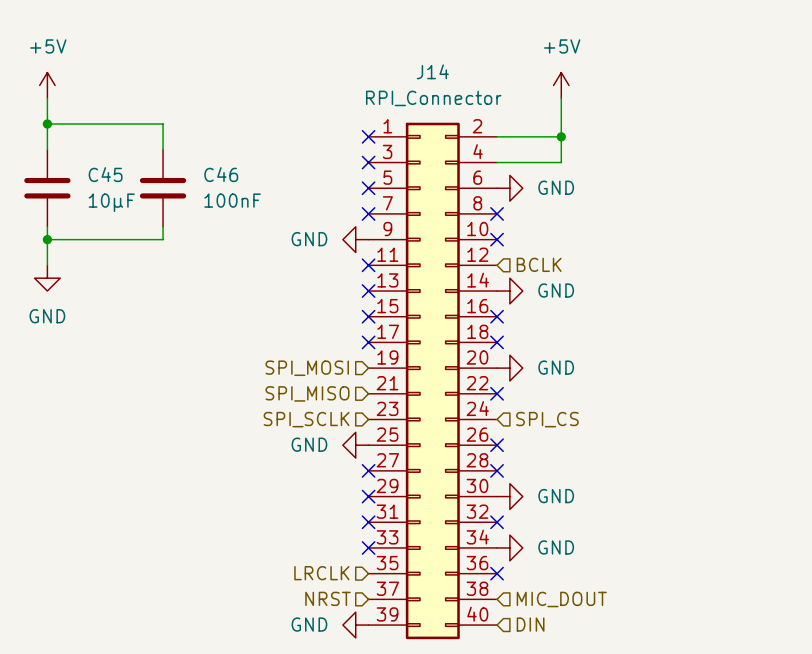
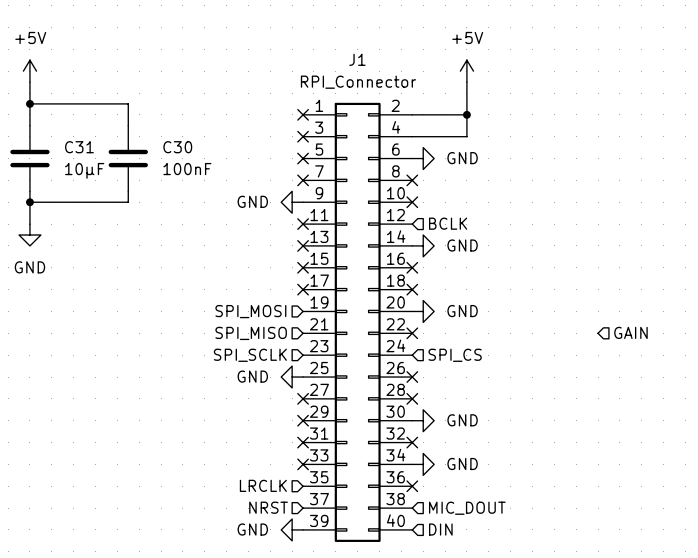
J14 name: J14 (432, 71) -> J1 (357, 59)
C45 name: C45 (105, 174) -> C31 (79, 147)
C46 name: C46 (221, 174) -> C30 (177, 147)
hierarchical label: none -> GAIN (630, 332)

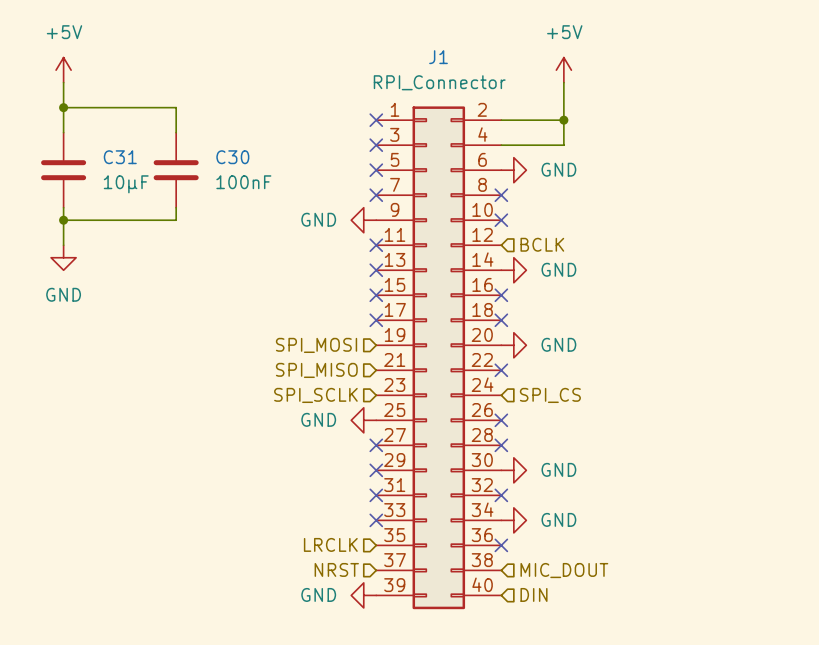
hierarchical label: GAIN (630, 332) -> none

